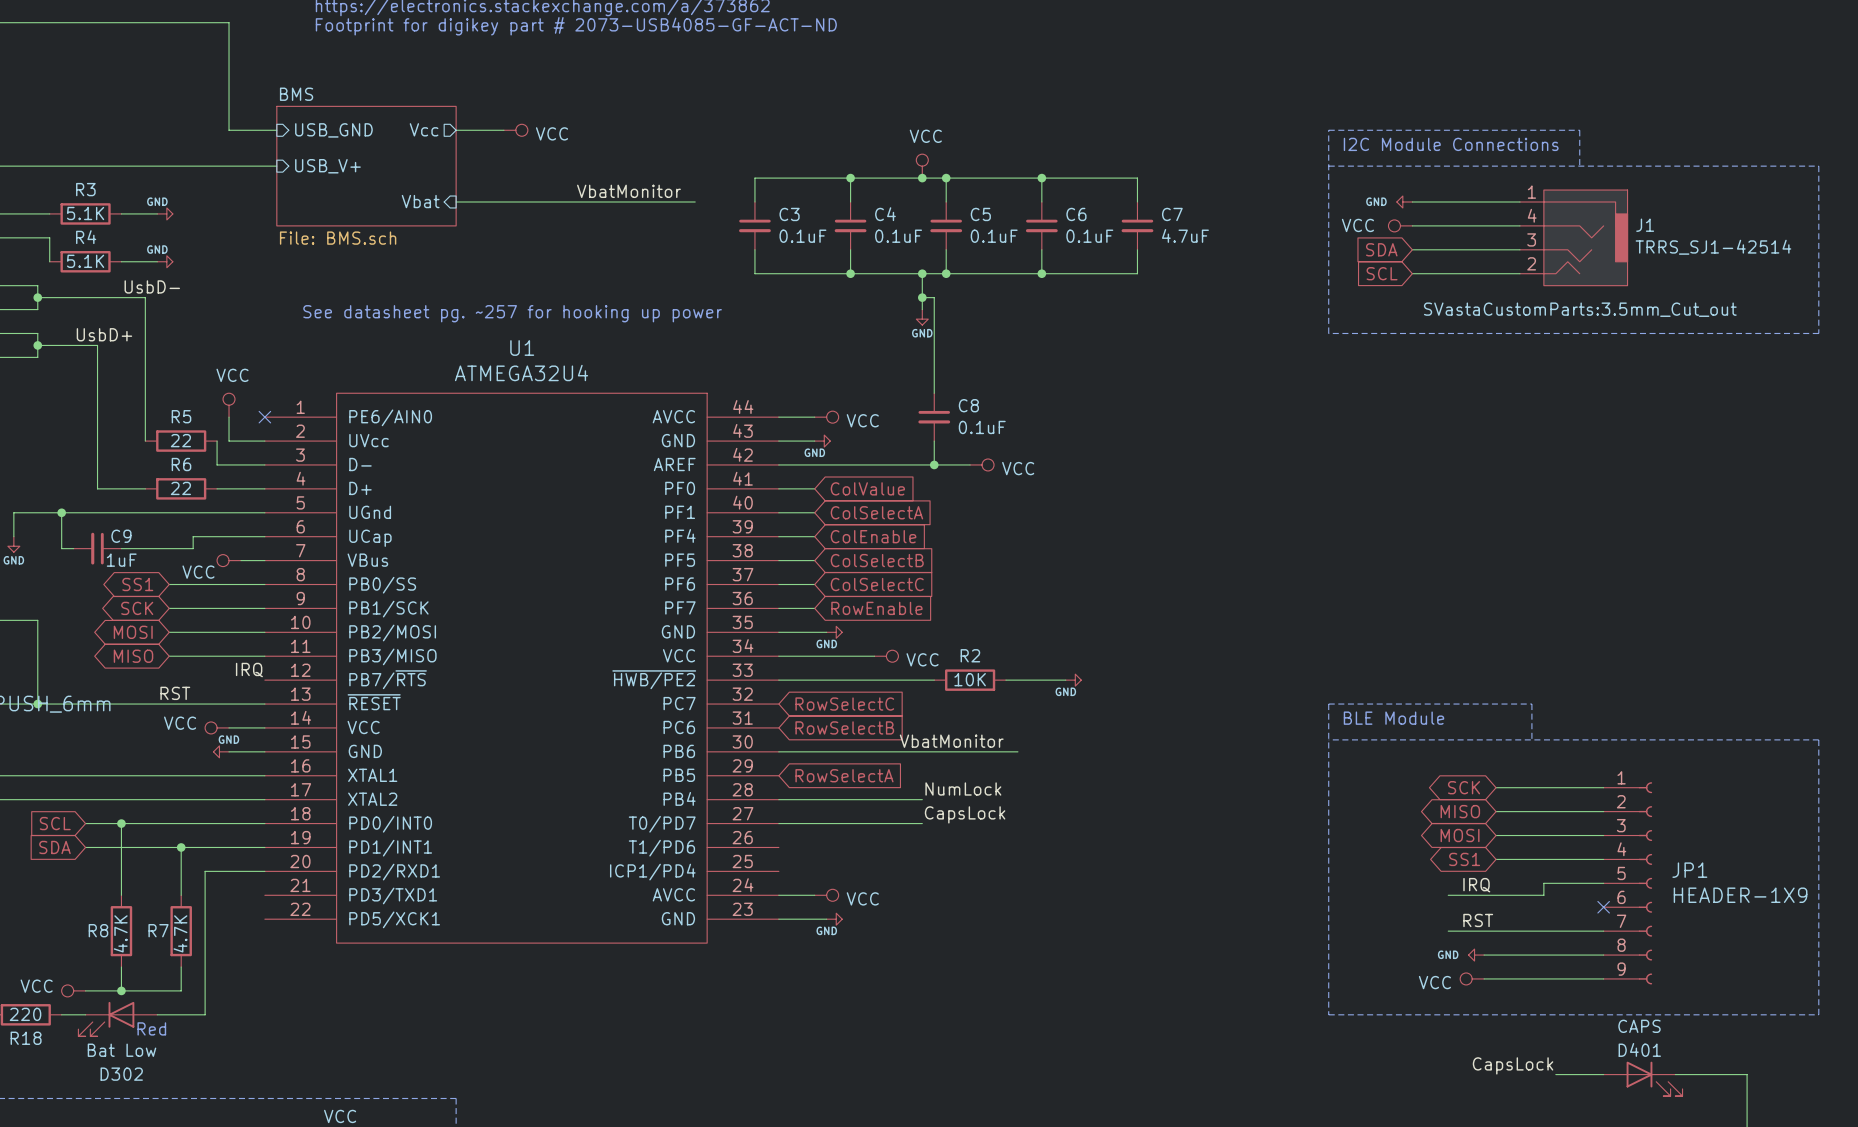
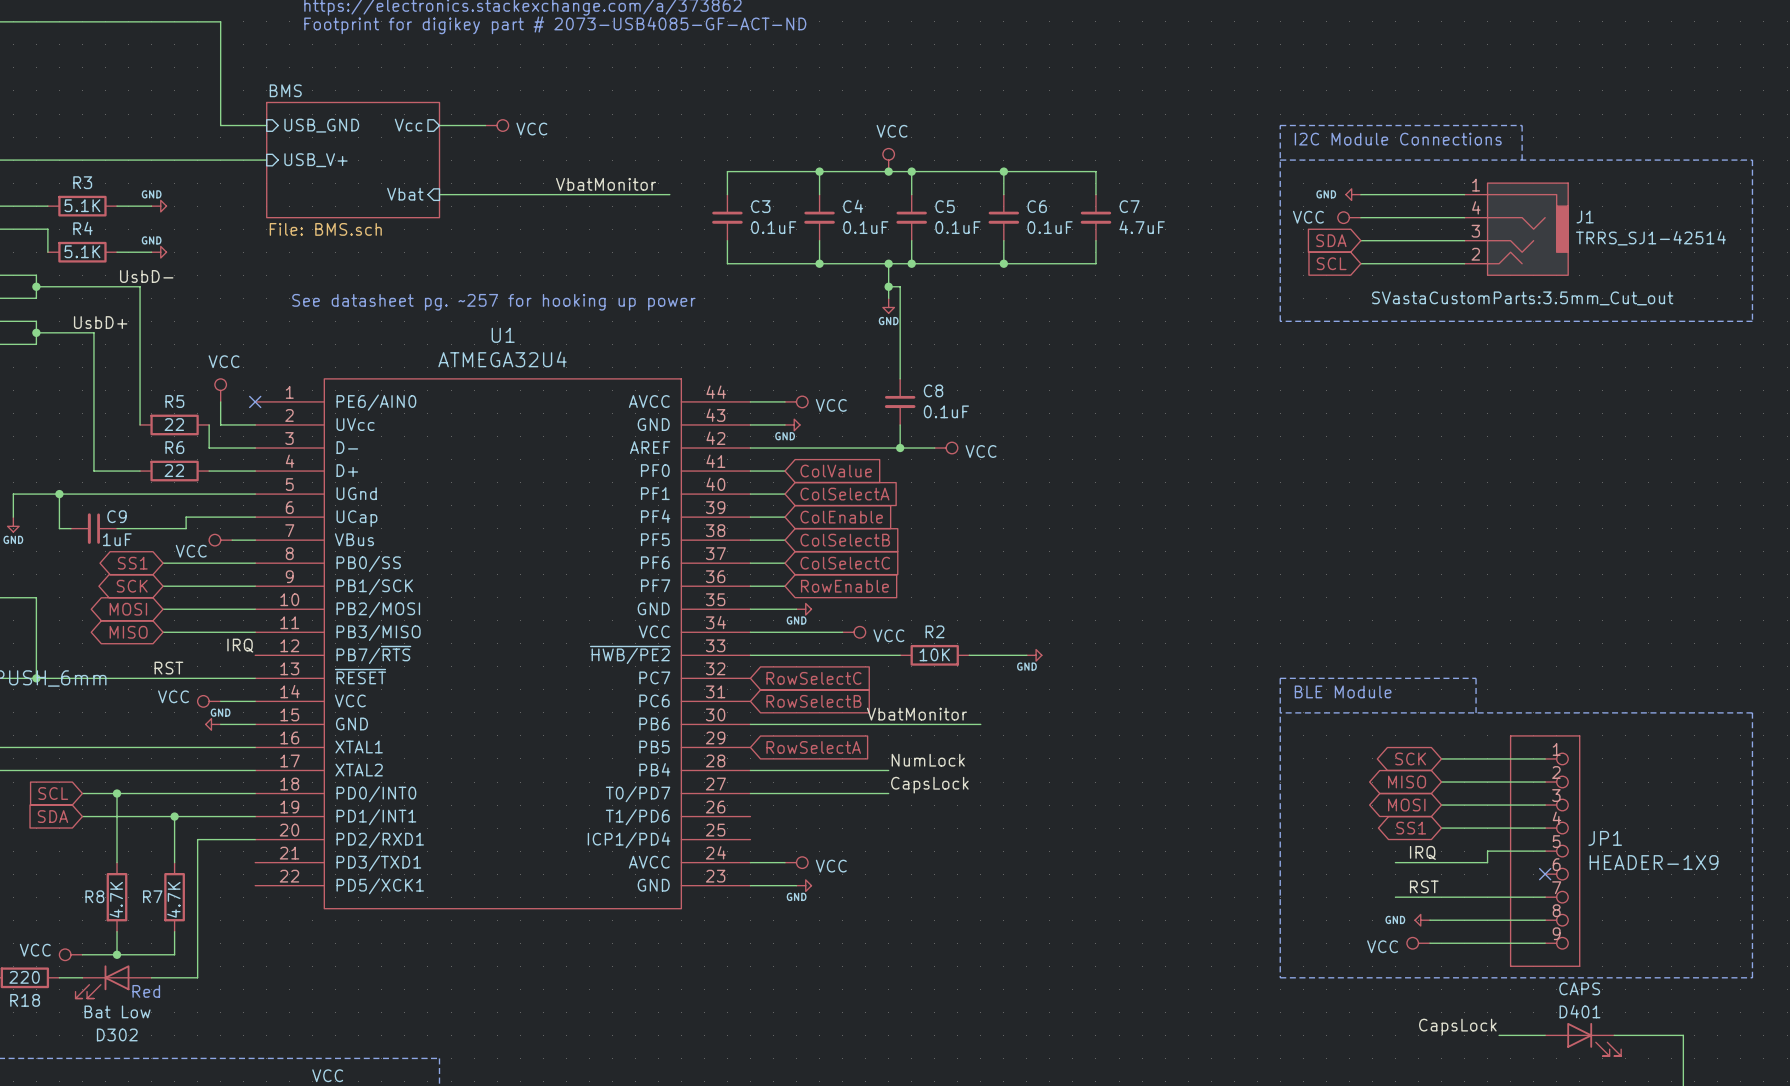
JP1 symbol: [1603, 782, 1653, 985] -> [1510, 735, 1580, 967]

